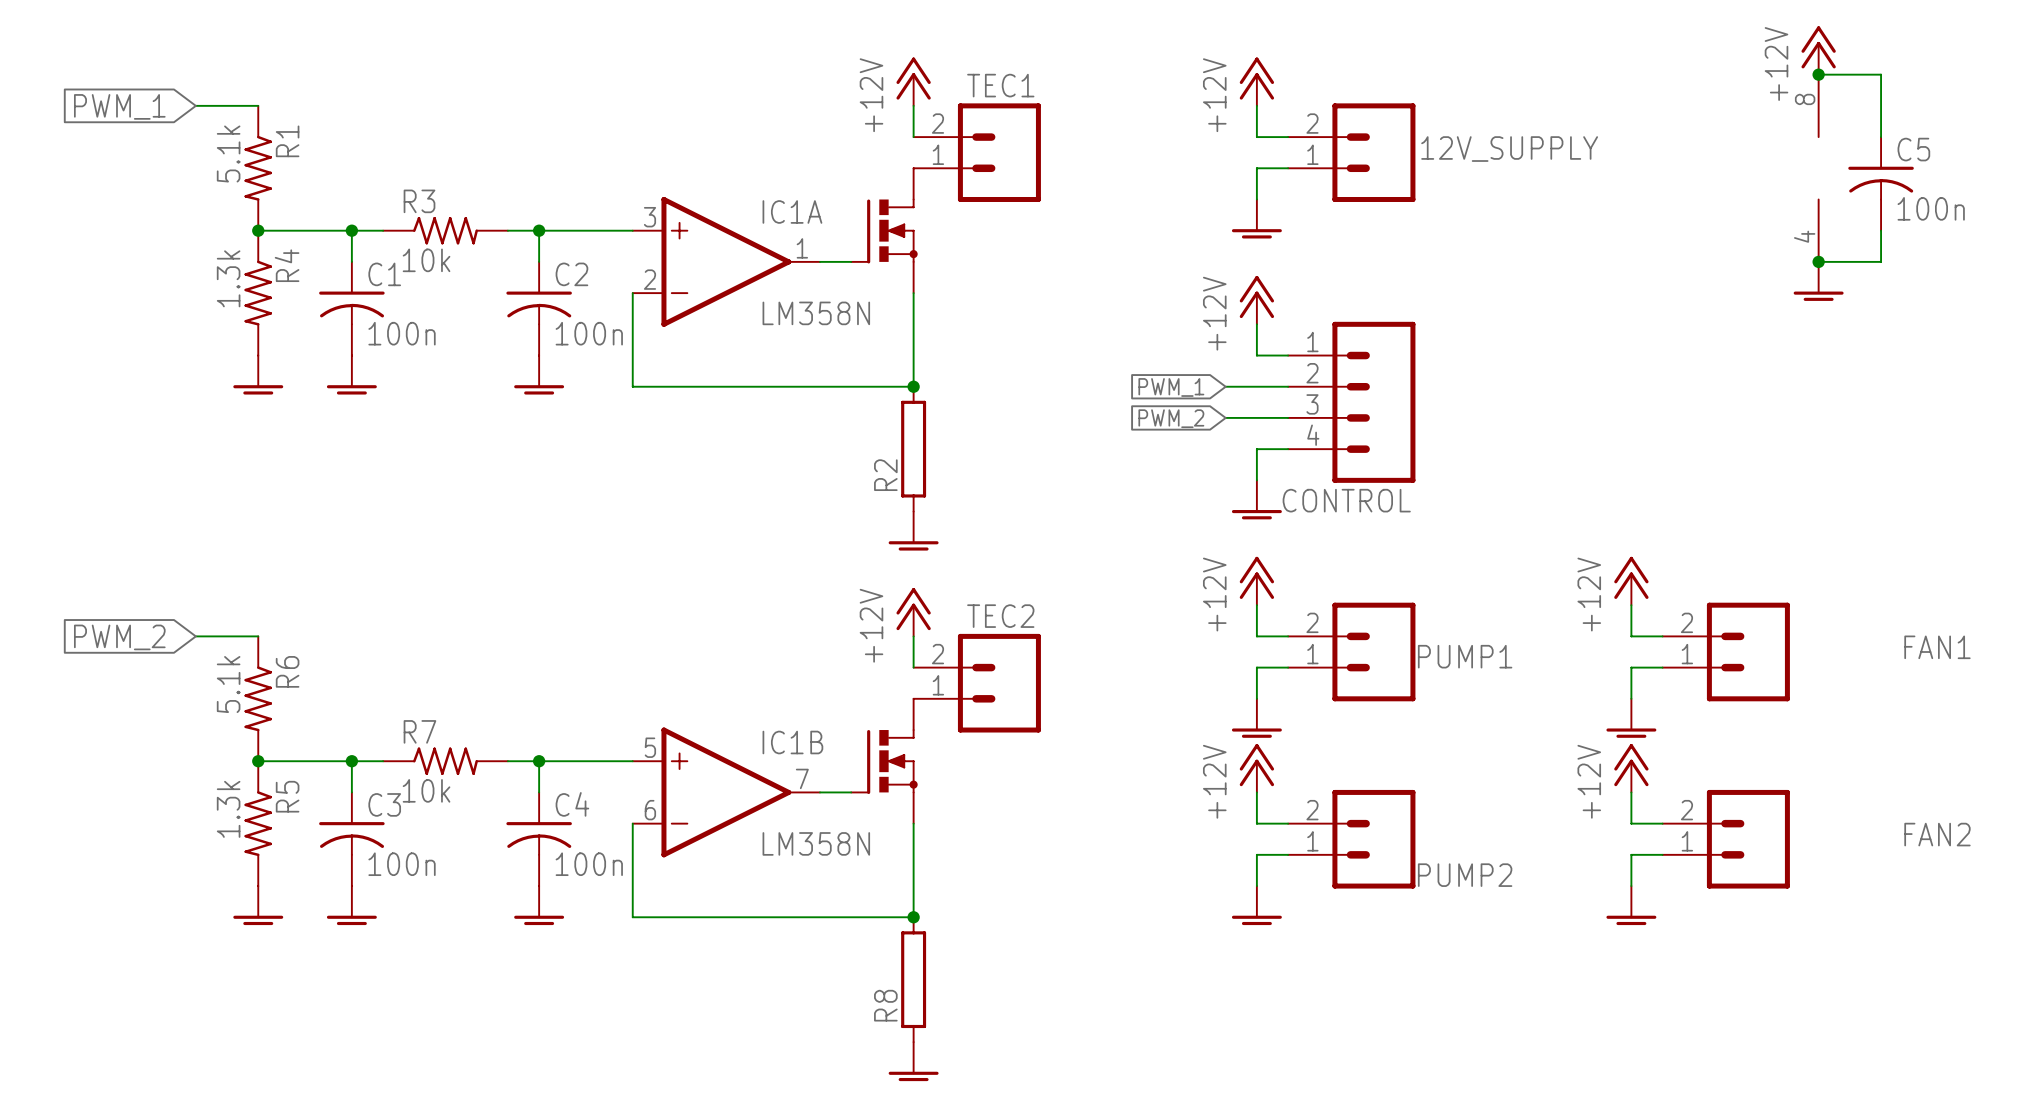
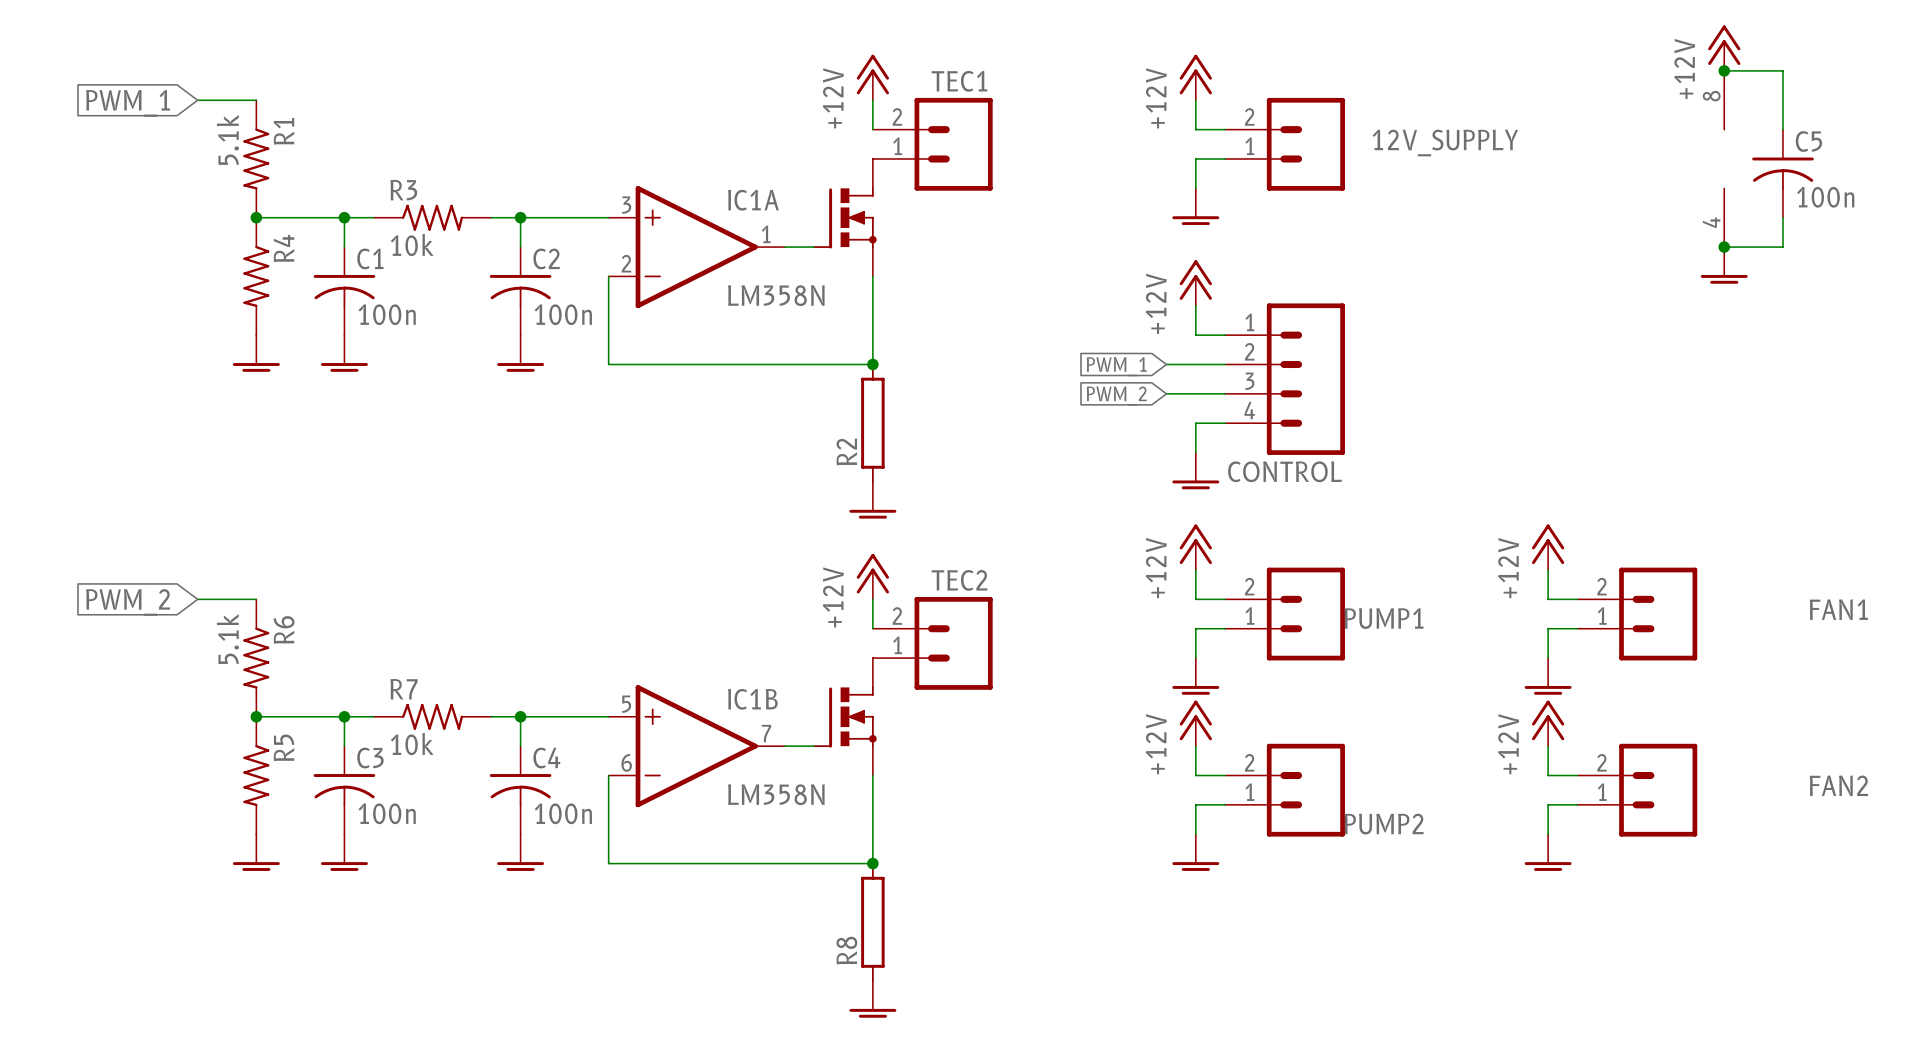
R4 value: 1.3k (228, 278) -> none
R5 value: 1.3k (228, 809) -> none

